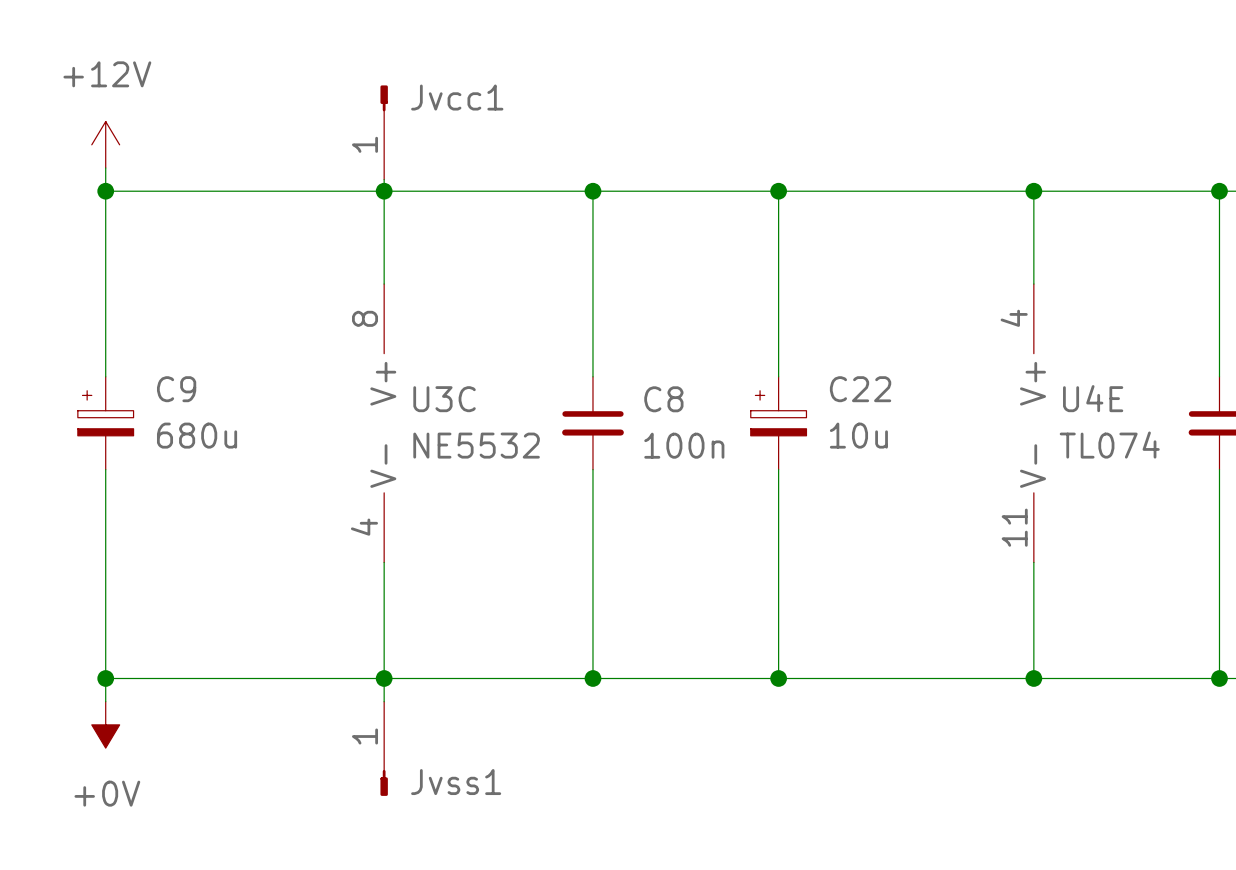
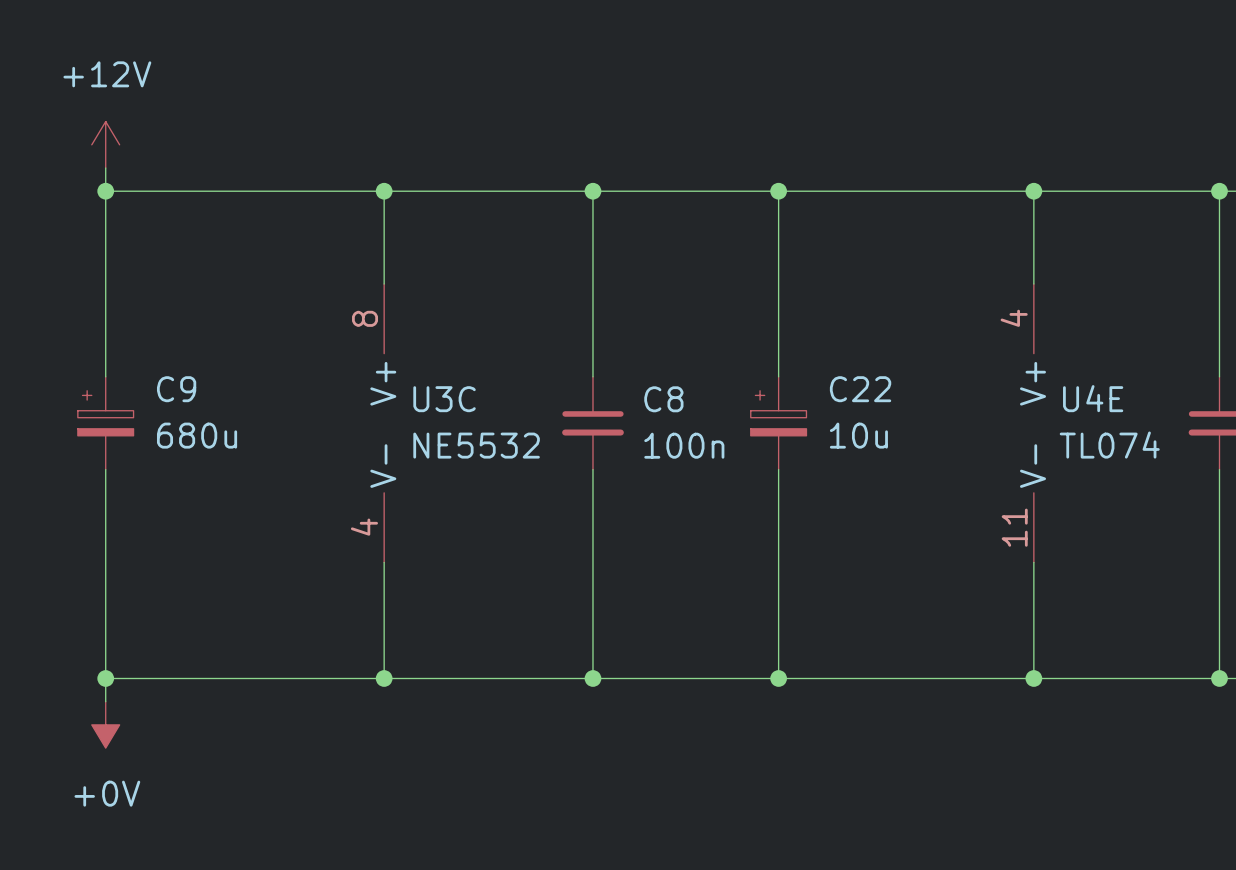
Jvcc1: (384, 132) -> none
wire: (384, 678) (384, 701) -> none
Jvss1: (384, 748) -> none

